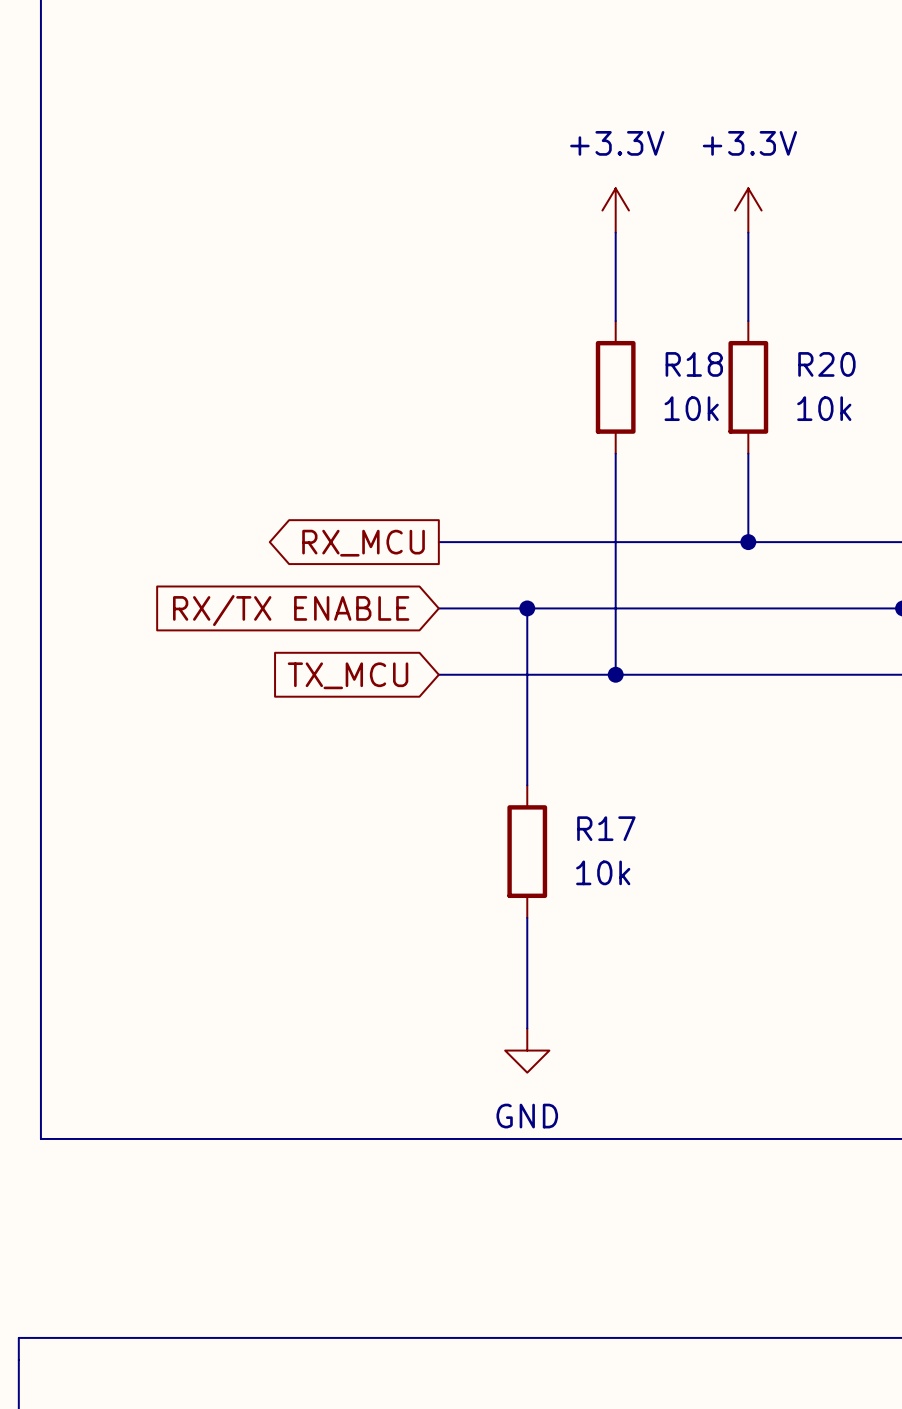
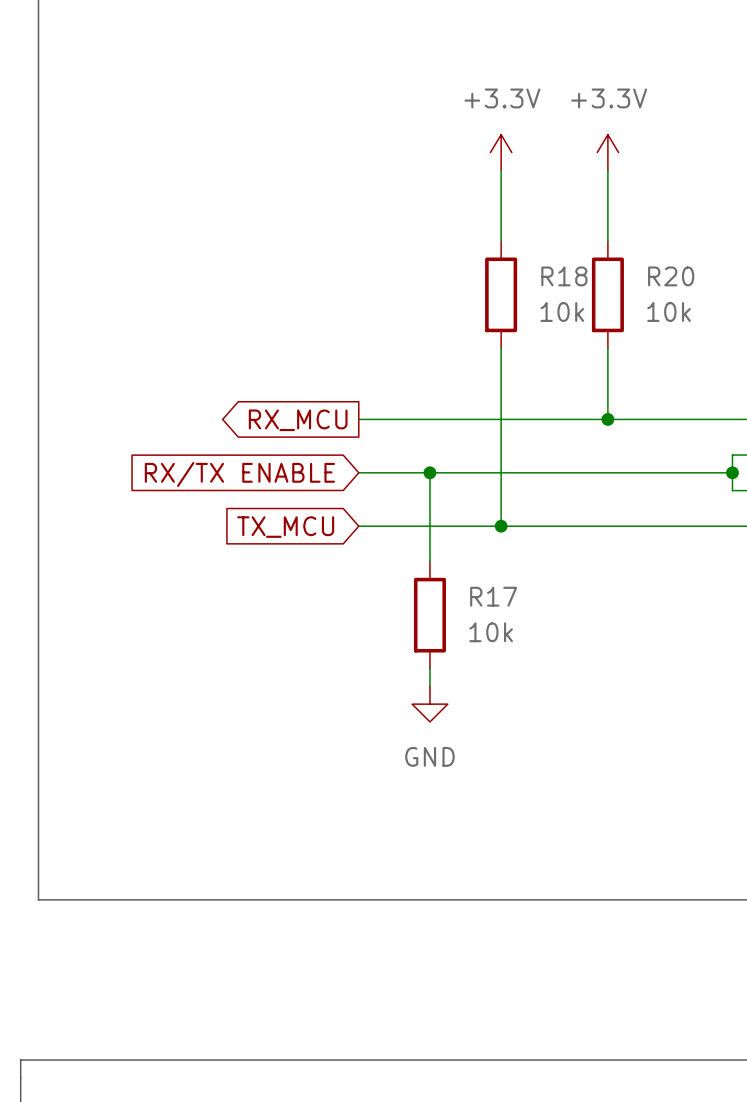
wire: (527, 718) (527, 785) -> none
wire: none -> (429, 668) (429, 686)
R17 position: (527, 851) -> (429, 615)
wire: (527, 917) (527, 1028) -> none
power symbol position: GND (527, 1050) -> GND (429, 704)

